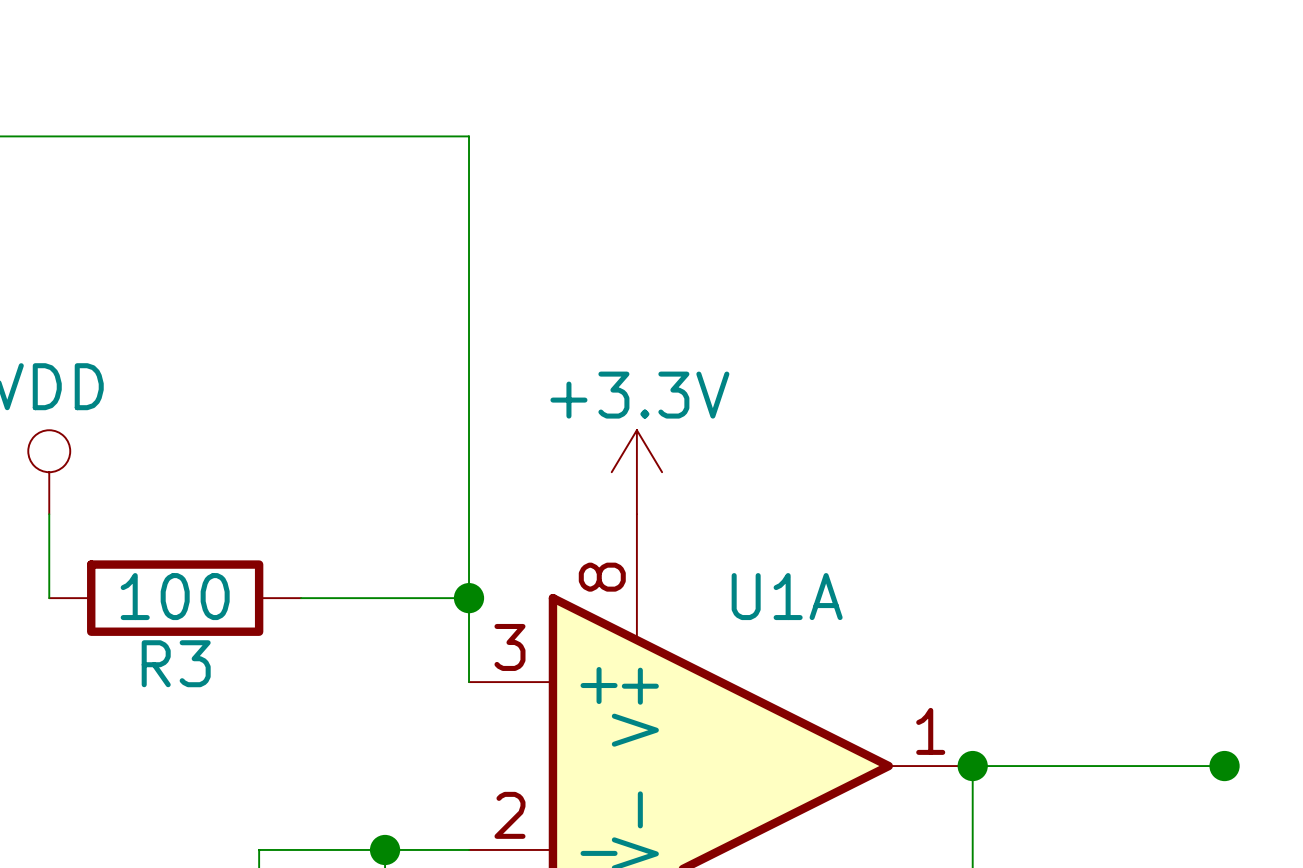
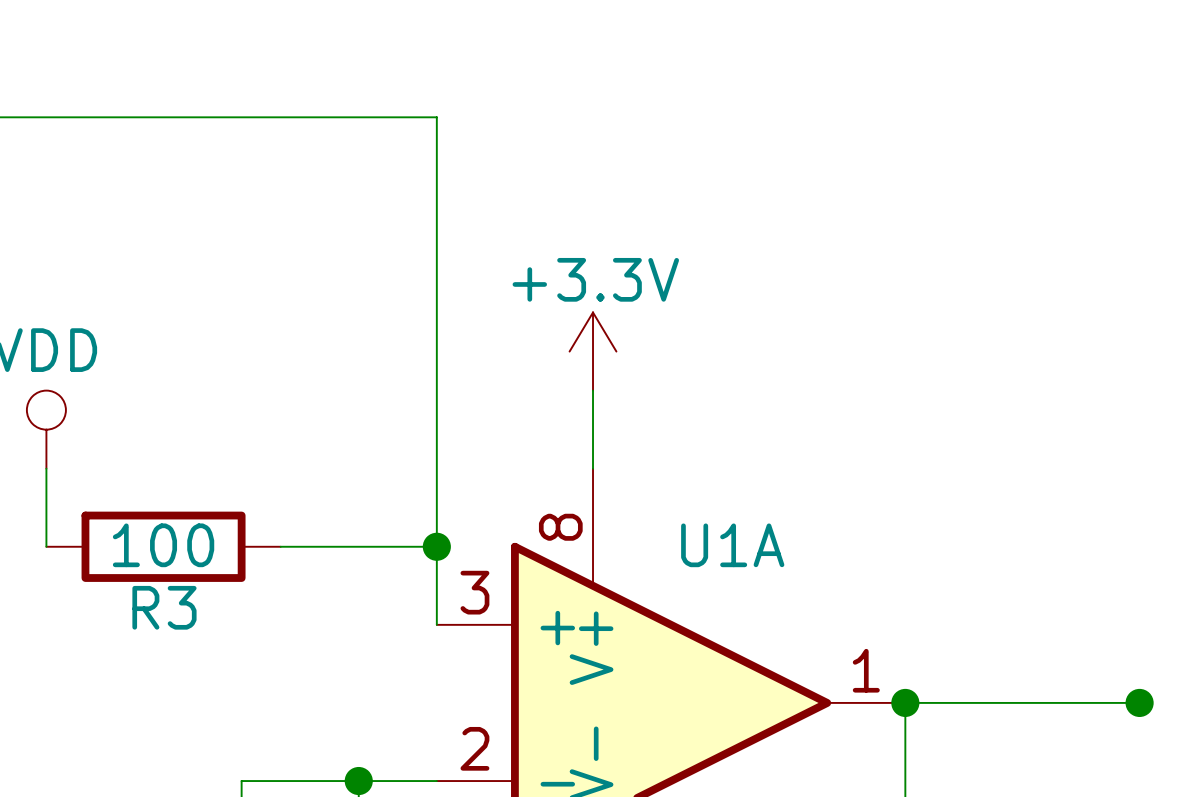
power symbol position: +3.3V (636, 472) -> +3.3V (593, 351)

